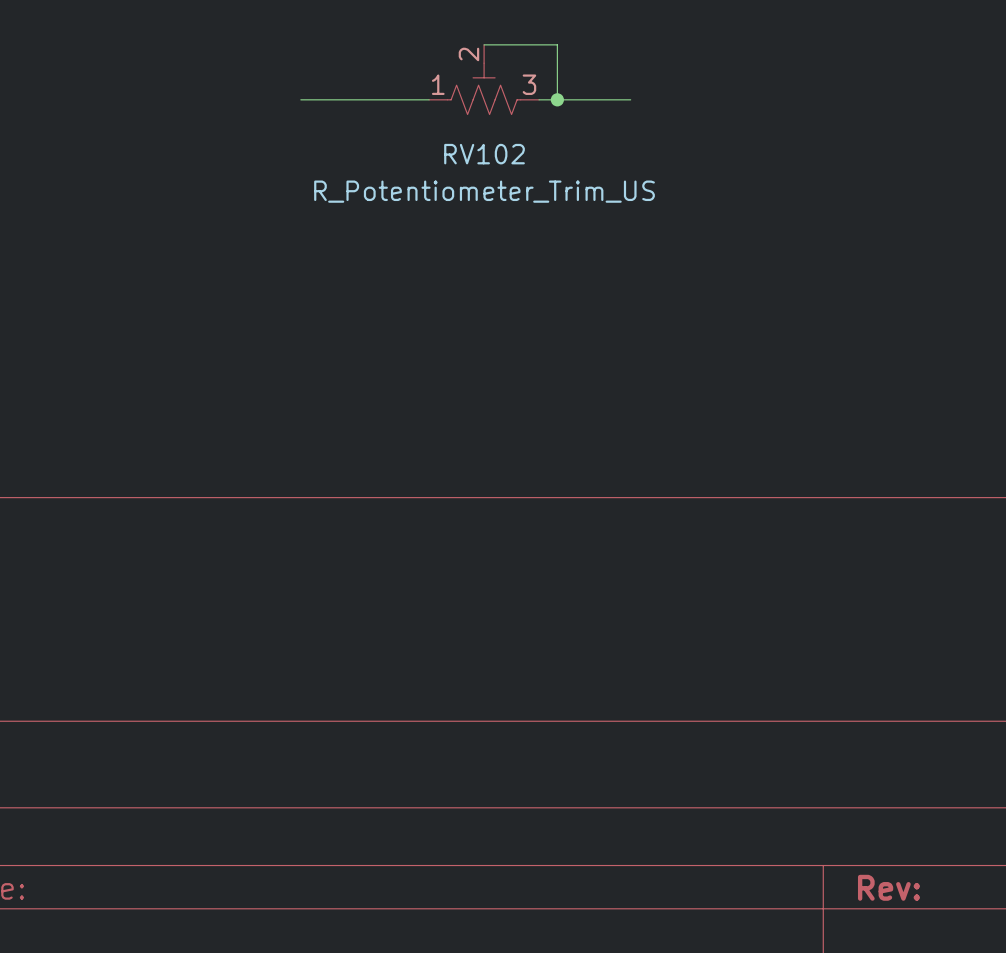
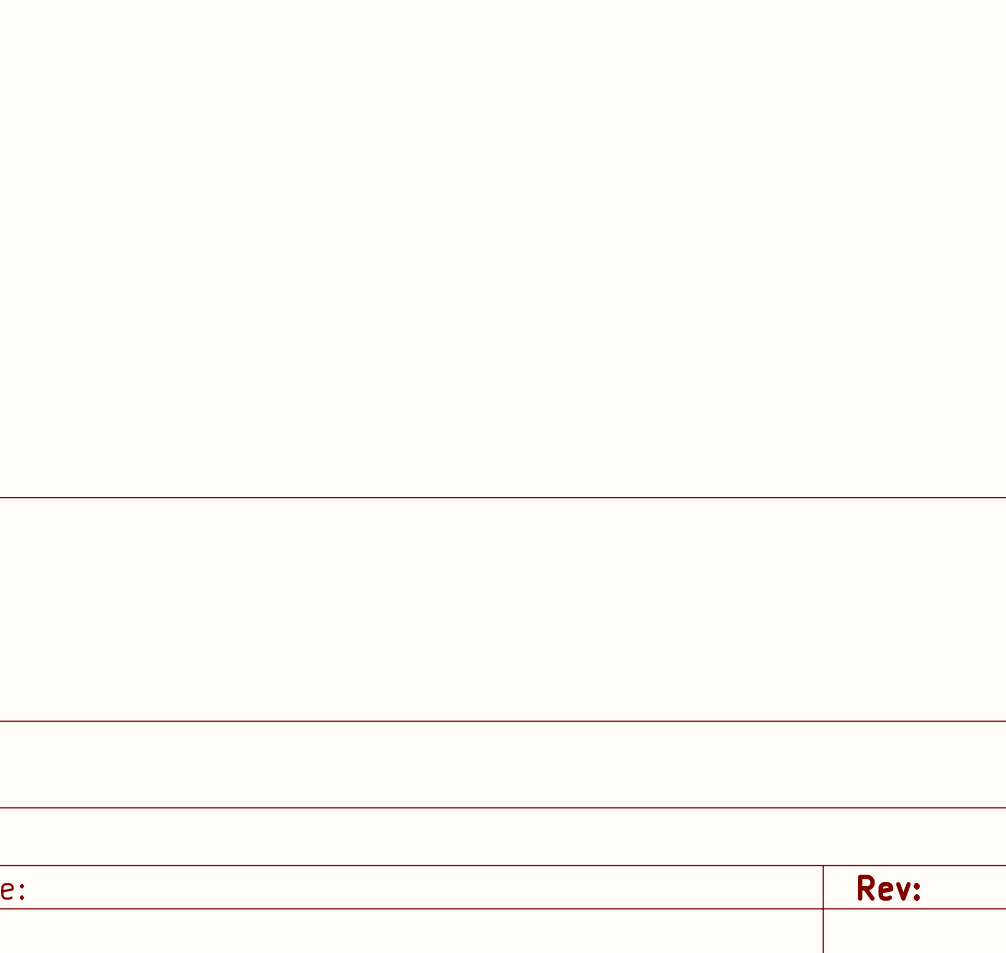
wire: (484, 44) (557, 44) (557, 99) -> none
RV102: R_Potentiometer_Trim_US (484, 79) -> none
wire: (300, 99) (429, 99) -> none
wire: (539, 99) (630, 99) -> none
junction: (557, 99) -> none

